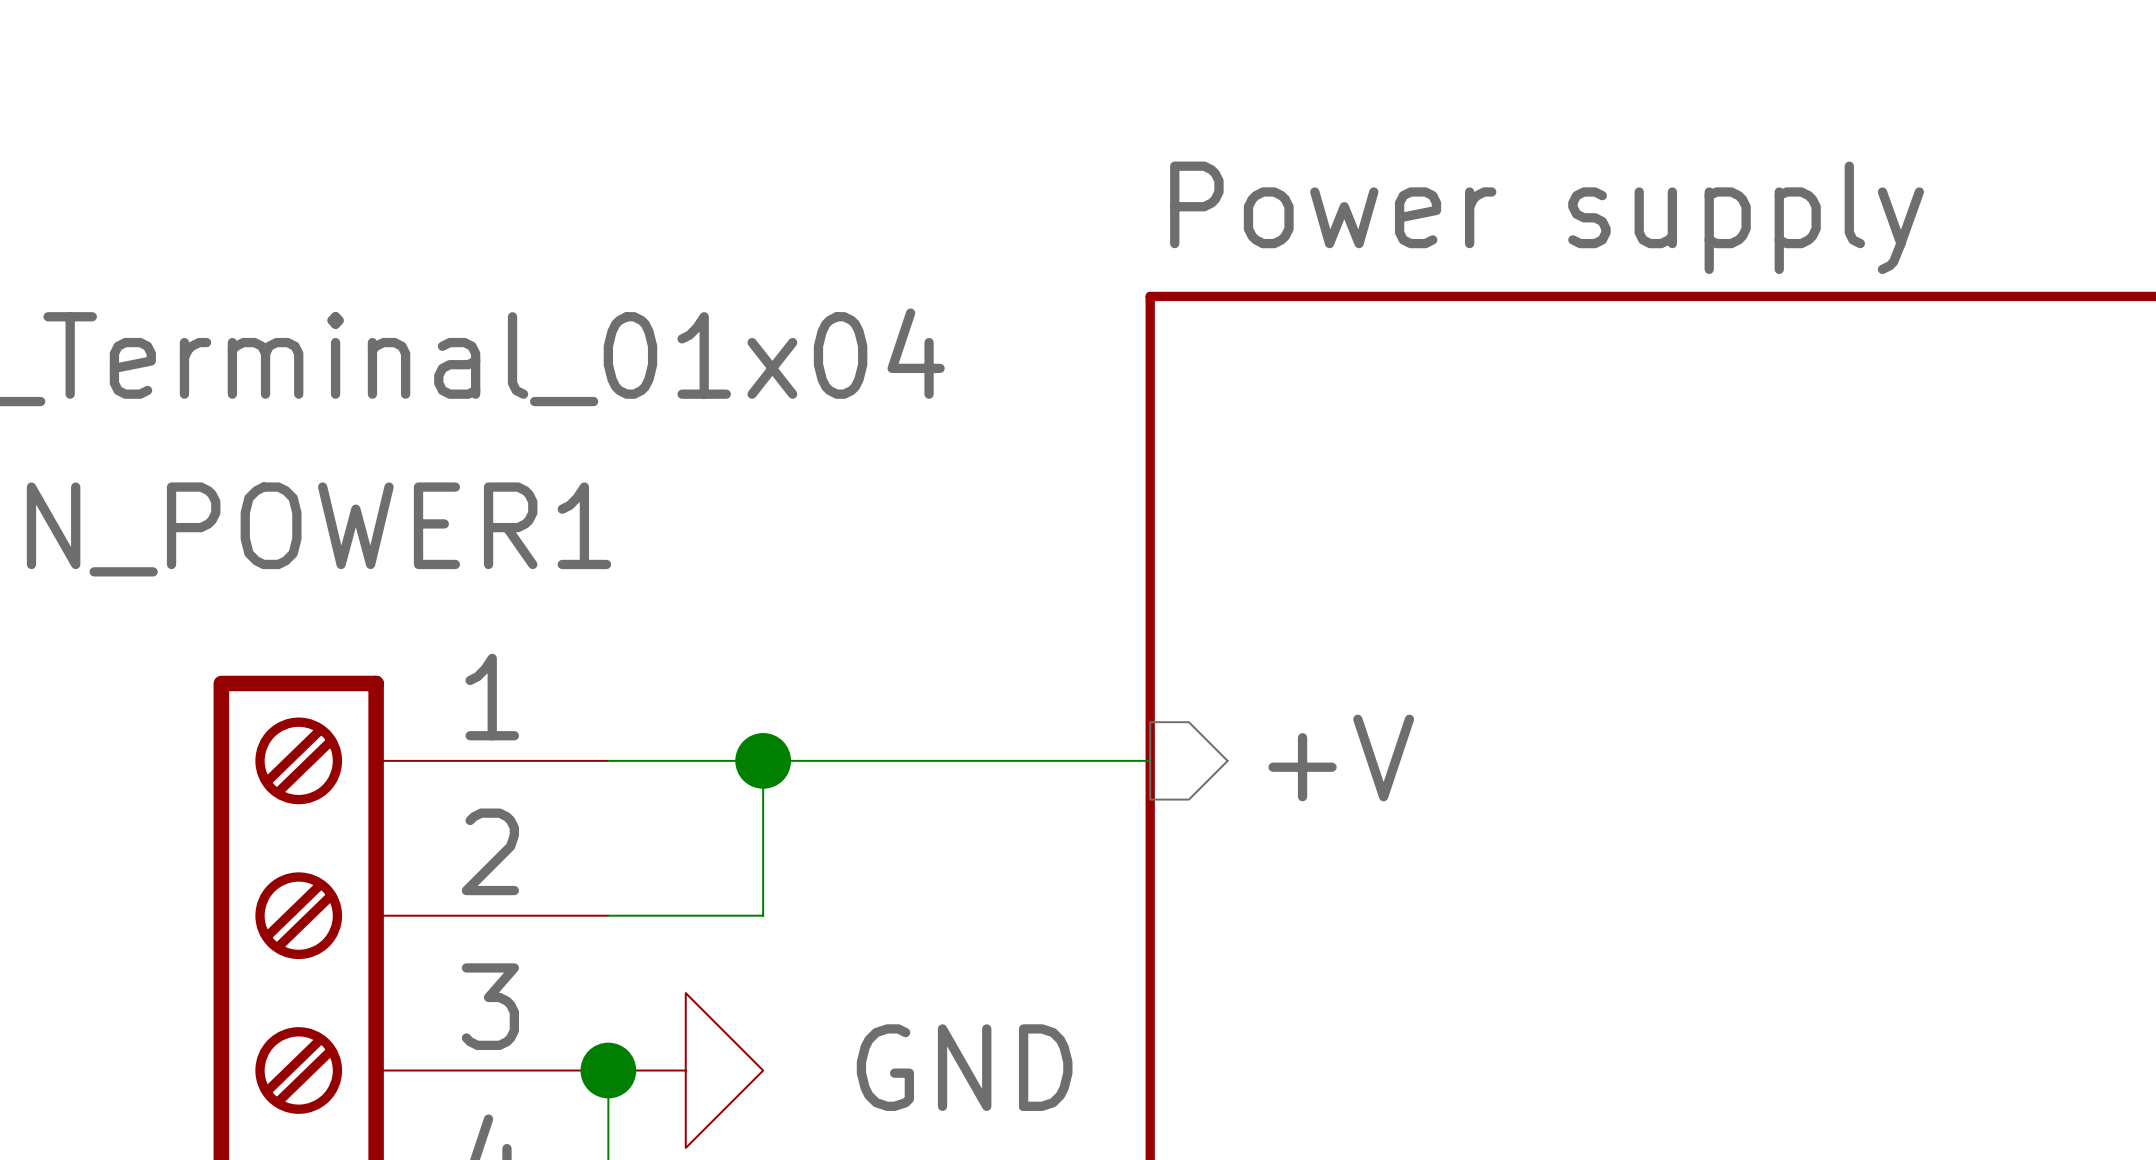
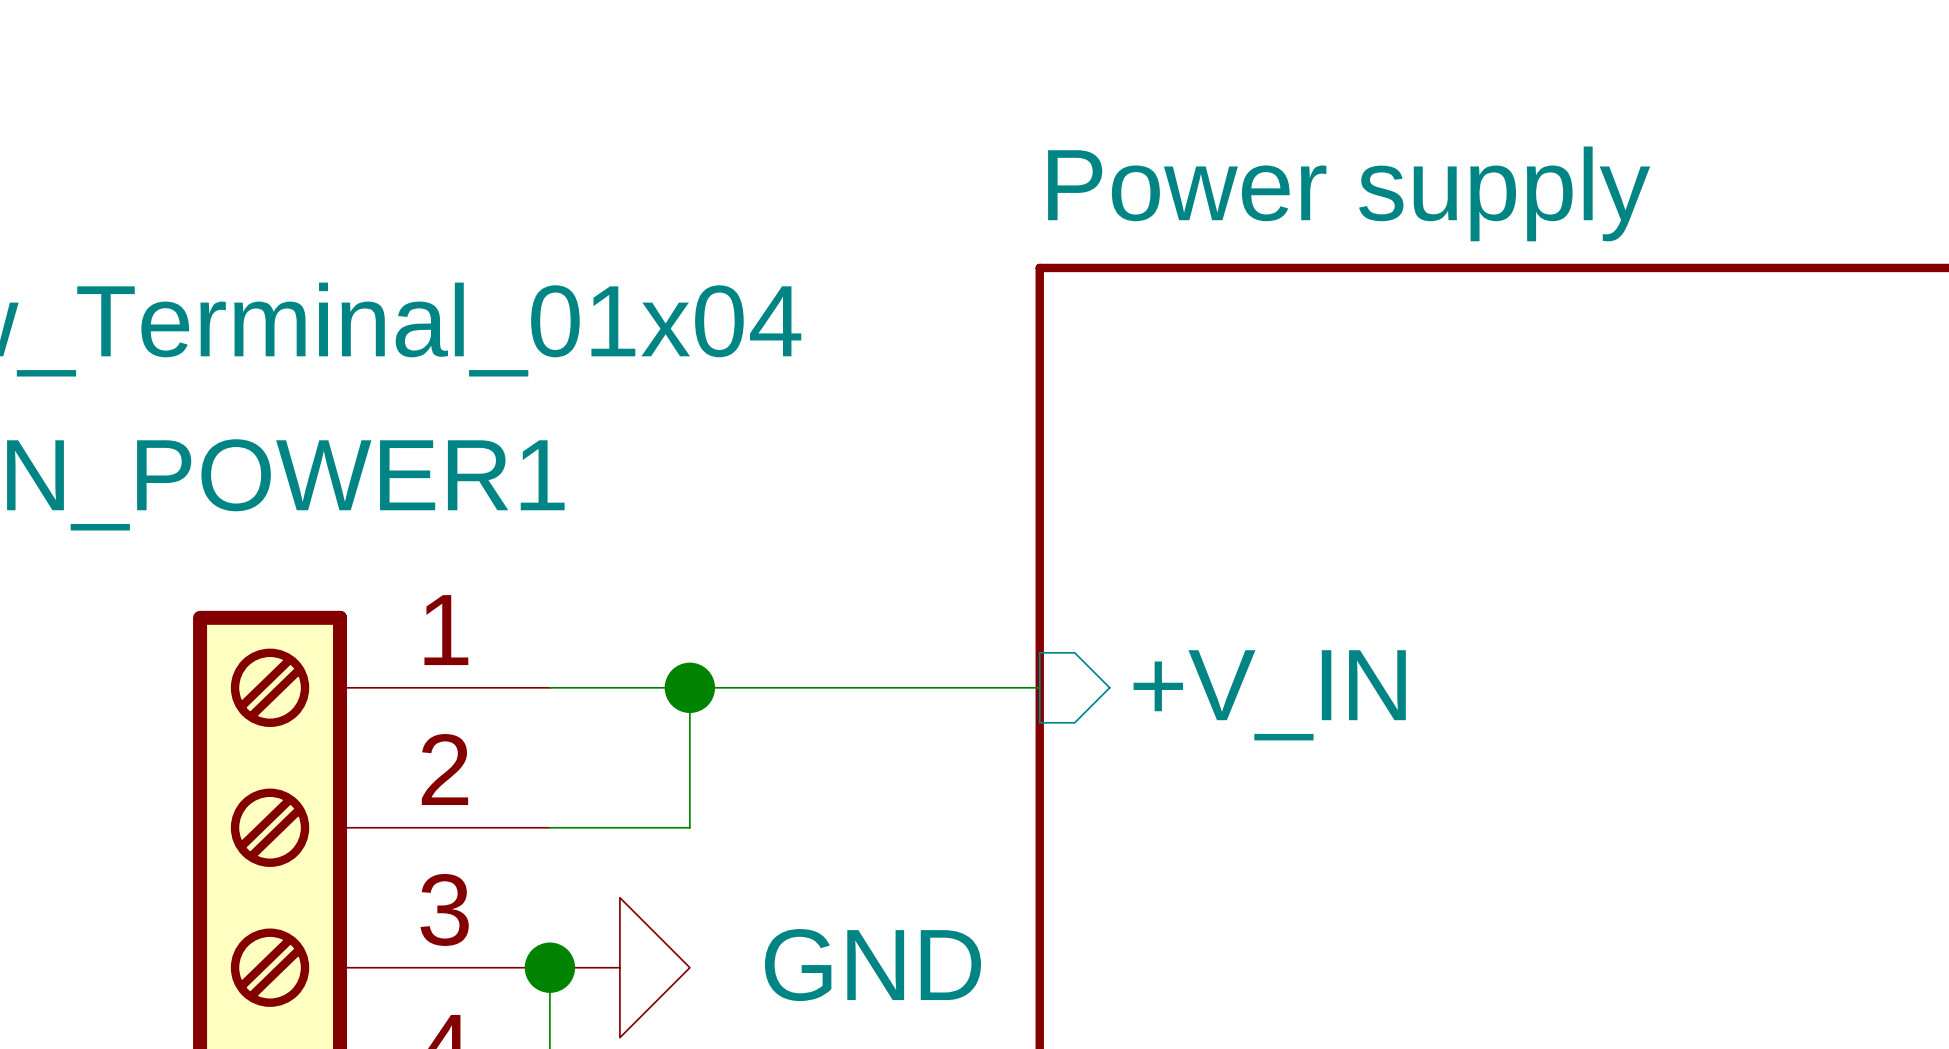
sheet pin: +V (1341, 757) -> +V_IN (1269, 695)

